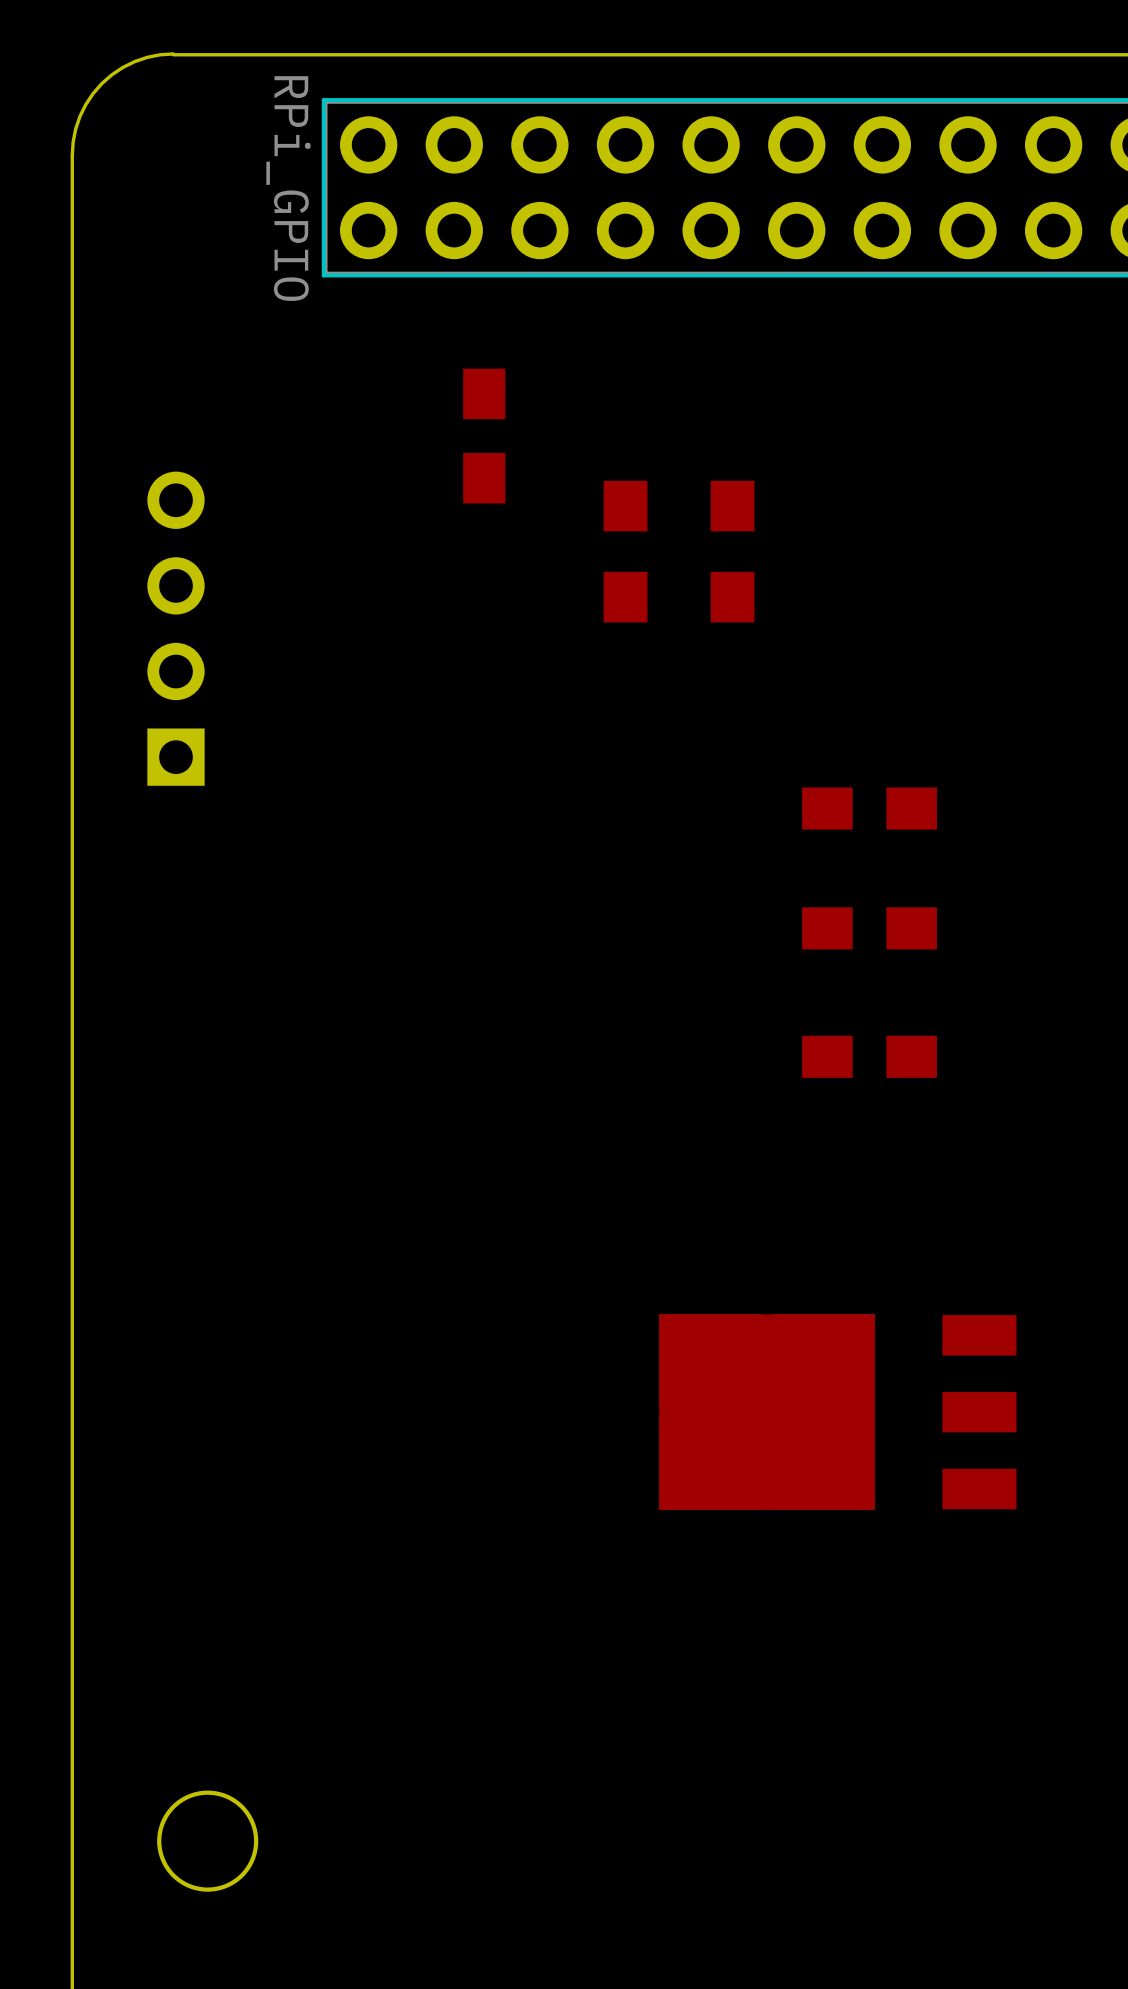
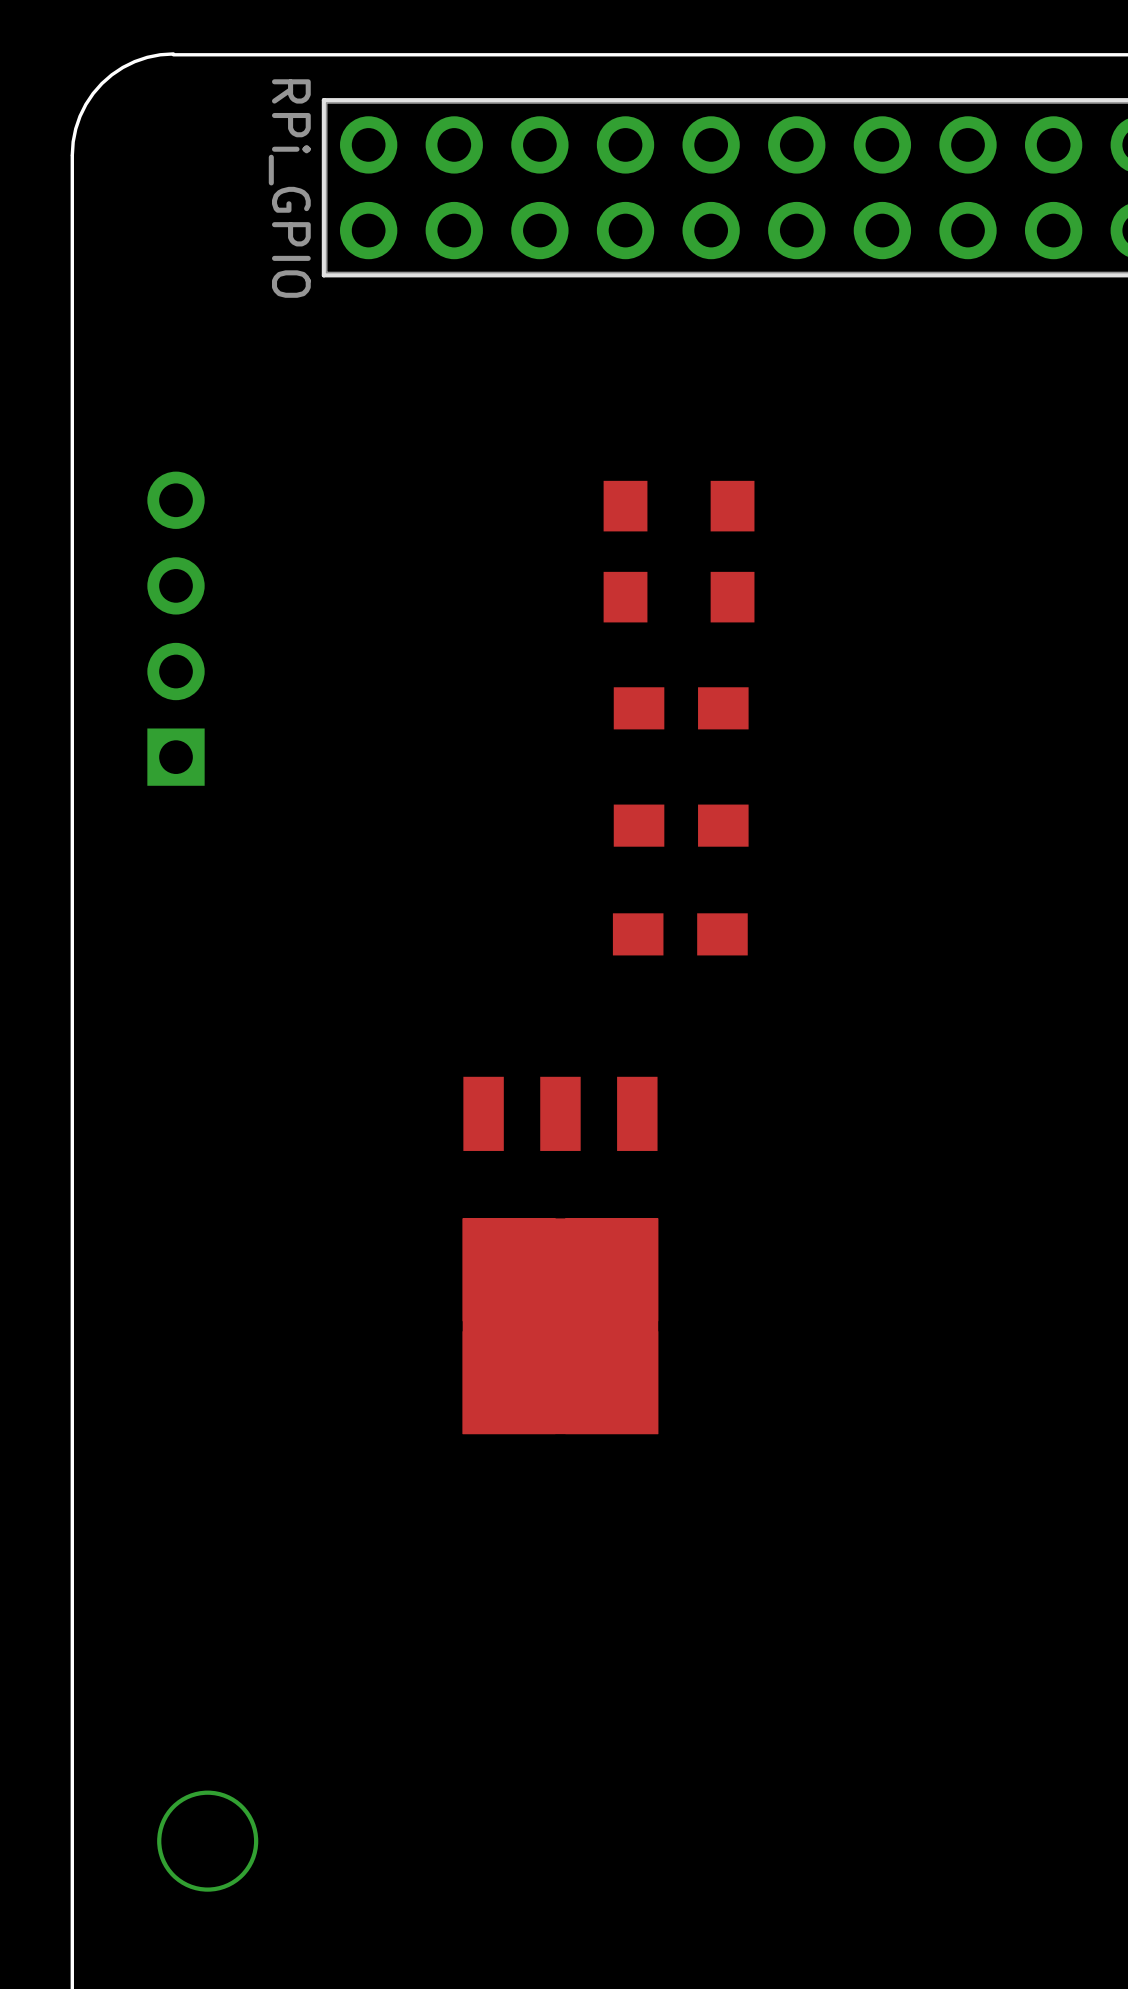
part: (484, 436) -> none
part: none -> (681, 708)
part: (869, 808) -> none
part: none -> (681, 825)
part: (869, 928) -> none
part: none -> (680, 934)
part: (869, 1056) -> none
part rotation: 0° (837, 1412) -> 90° counterclockwise (560, 1255)
part position: (837, 1412) -> (560, 1255)

